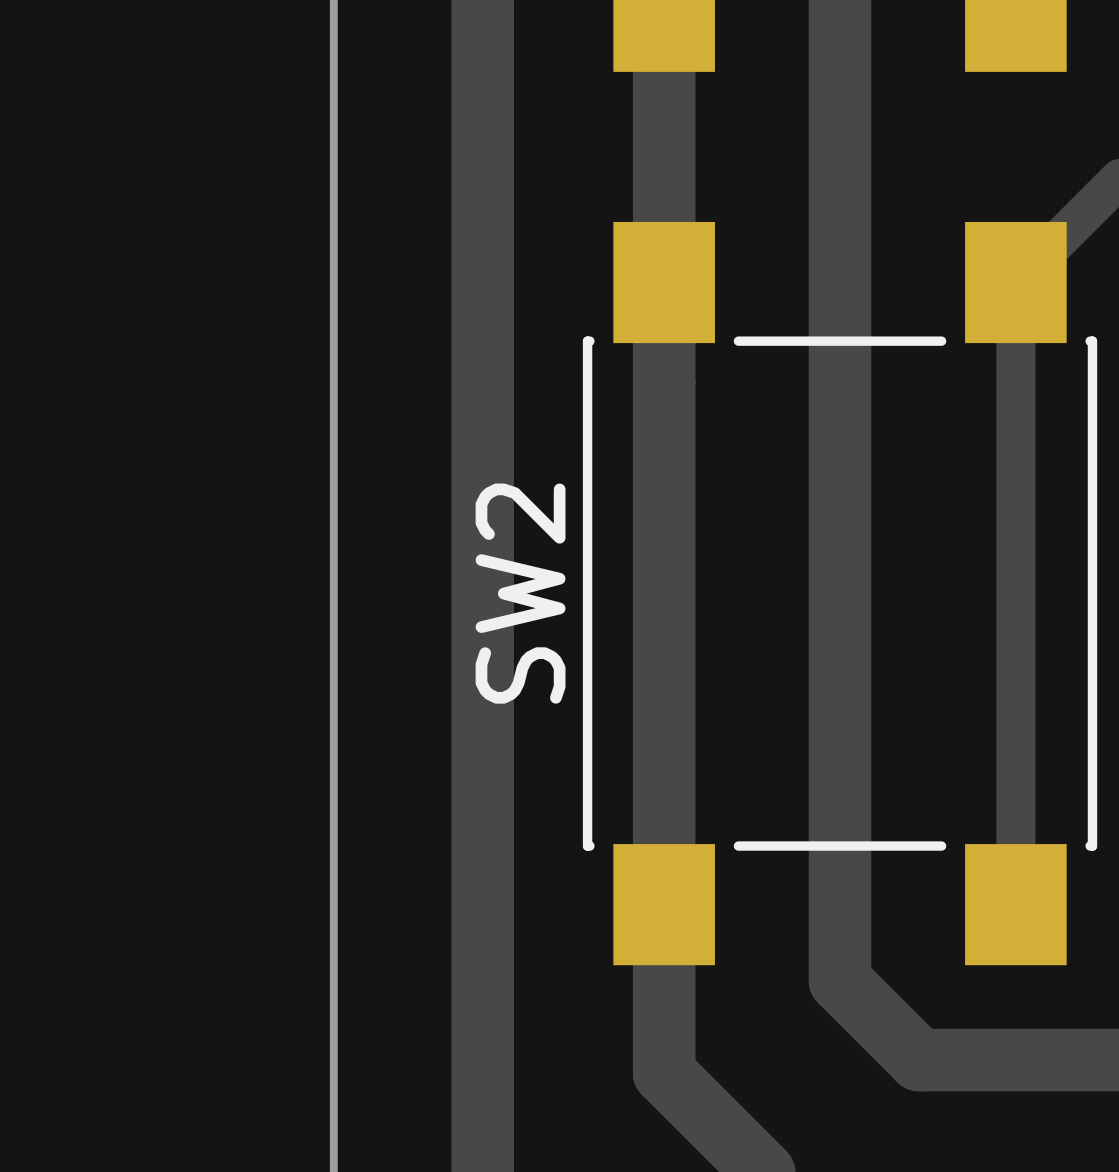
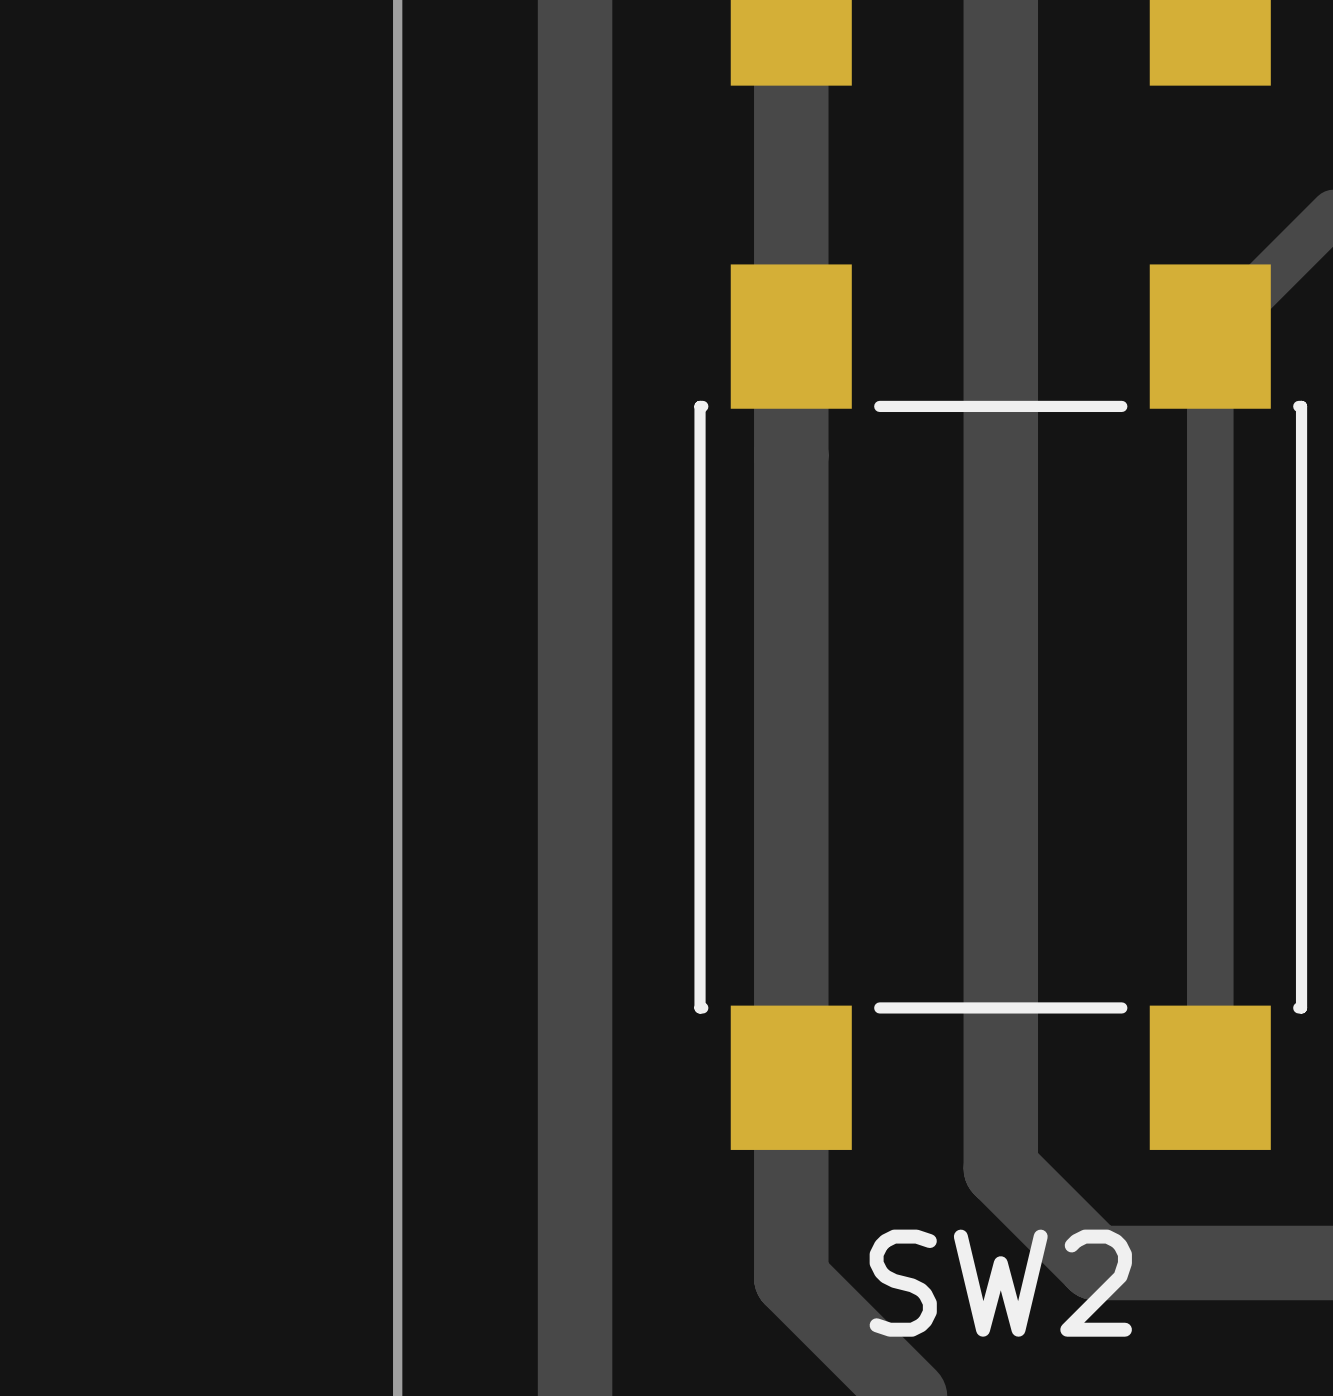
SW2 name rotation: 0° (520, 593) -> 90° clockwise (1000, 1283)
SW2 name position: SW2 (520, 593) -> SW2 (1000, 1283)

